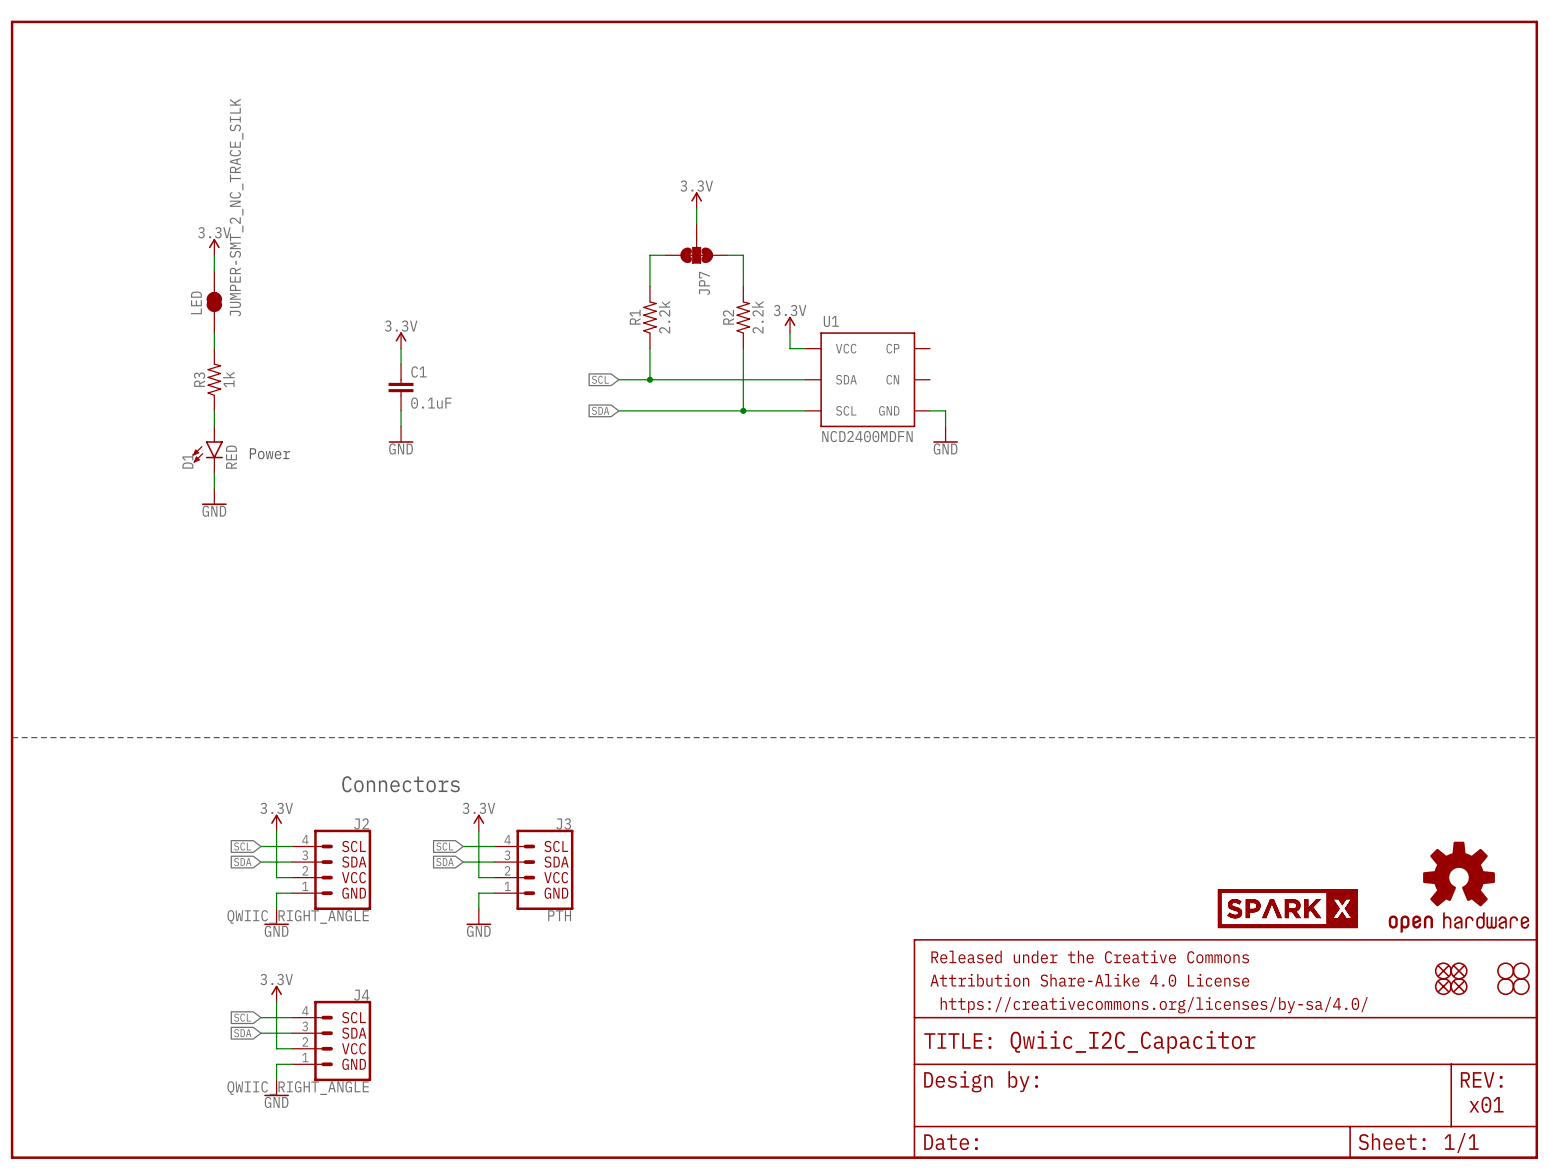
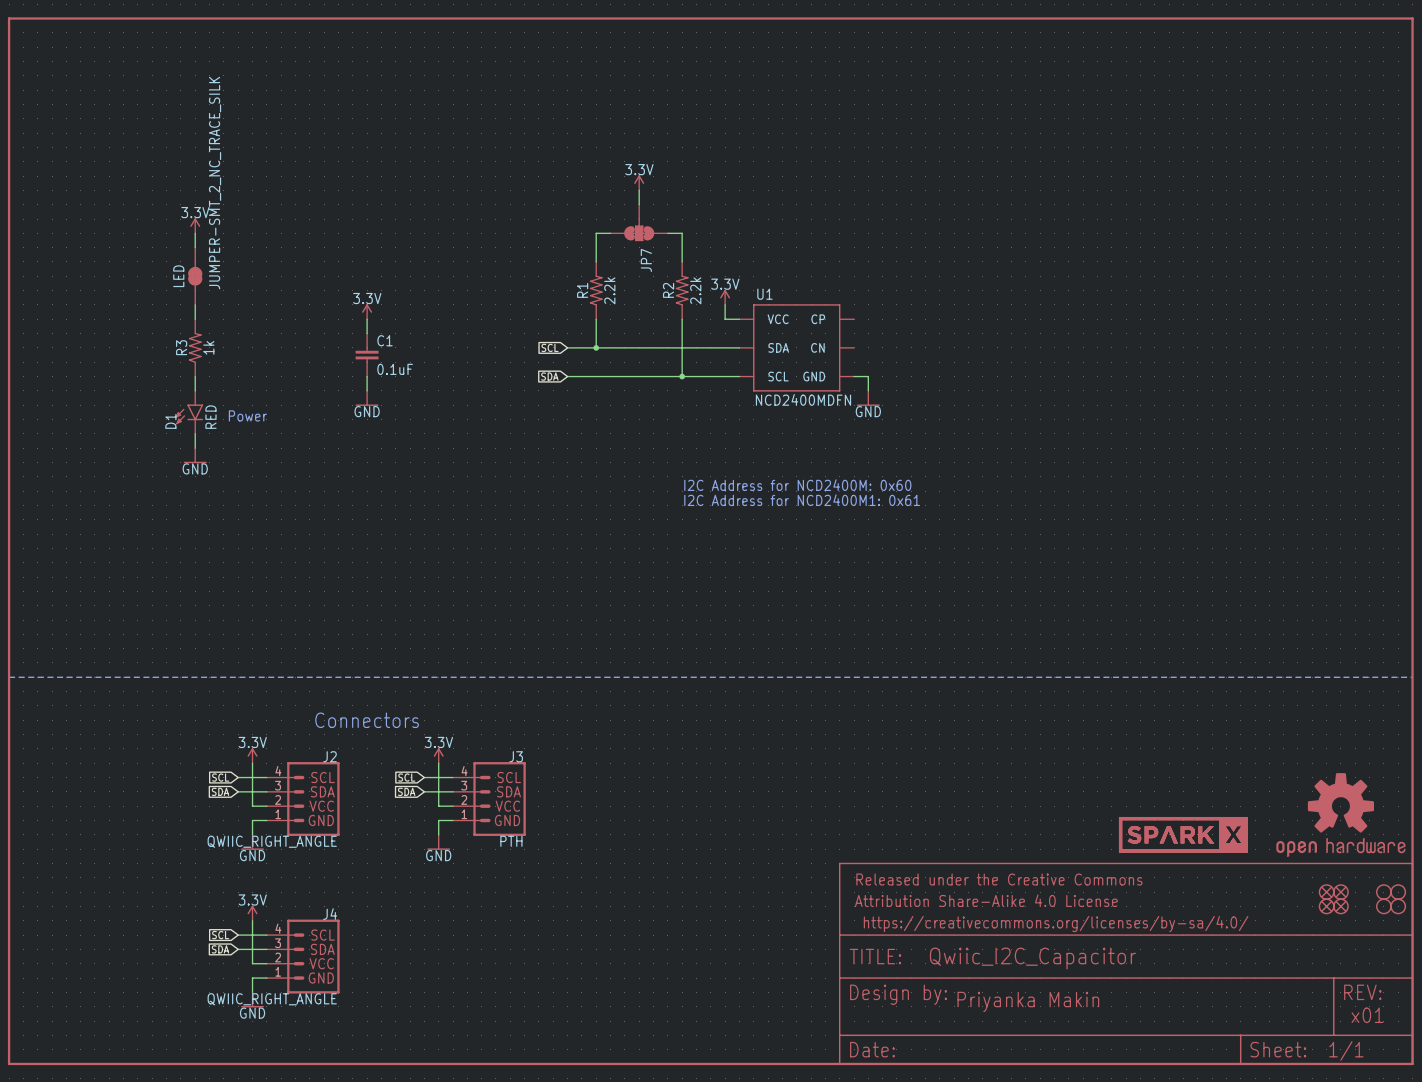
text: none -> I2C Address for NCD2400M: 0x60 (797, 485)
text: none -> I2C Address for NCD2400M1: 0x61 (802, 500)
text: none -> Priyanka Makin (1028, 1001)

